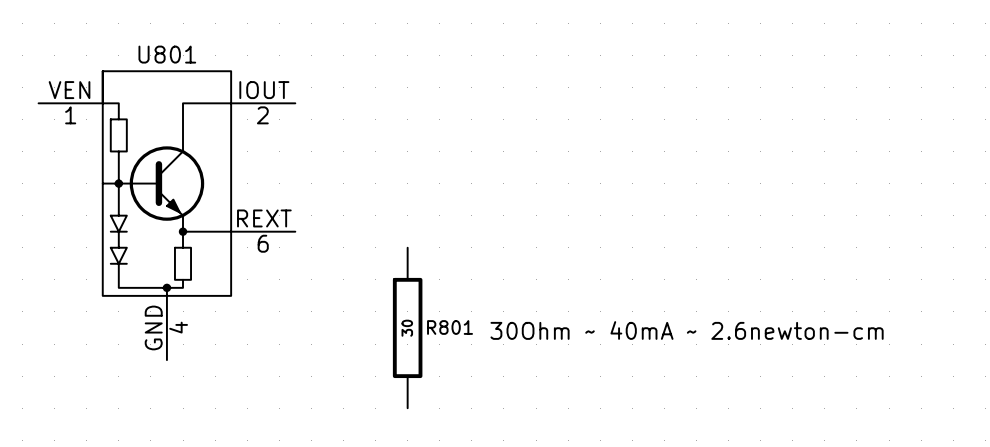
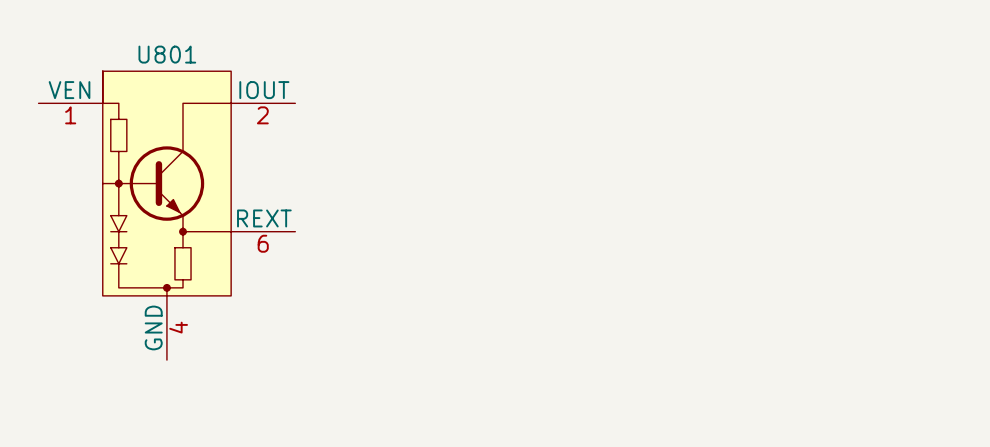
R801: 30 (407, 327) -> none
text: 30Ohm ~ 40mA ~ 2.6newton-cm (687, 330) -> none

